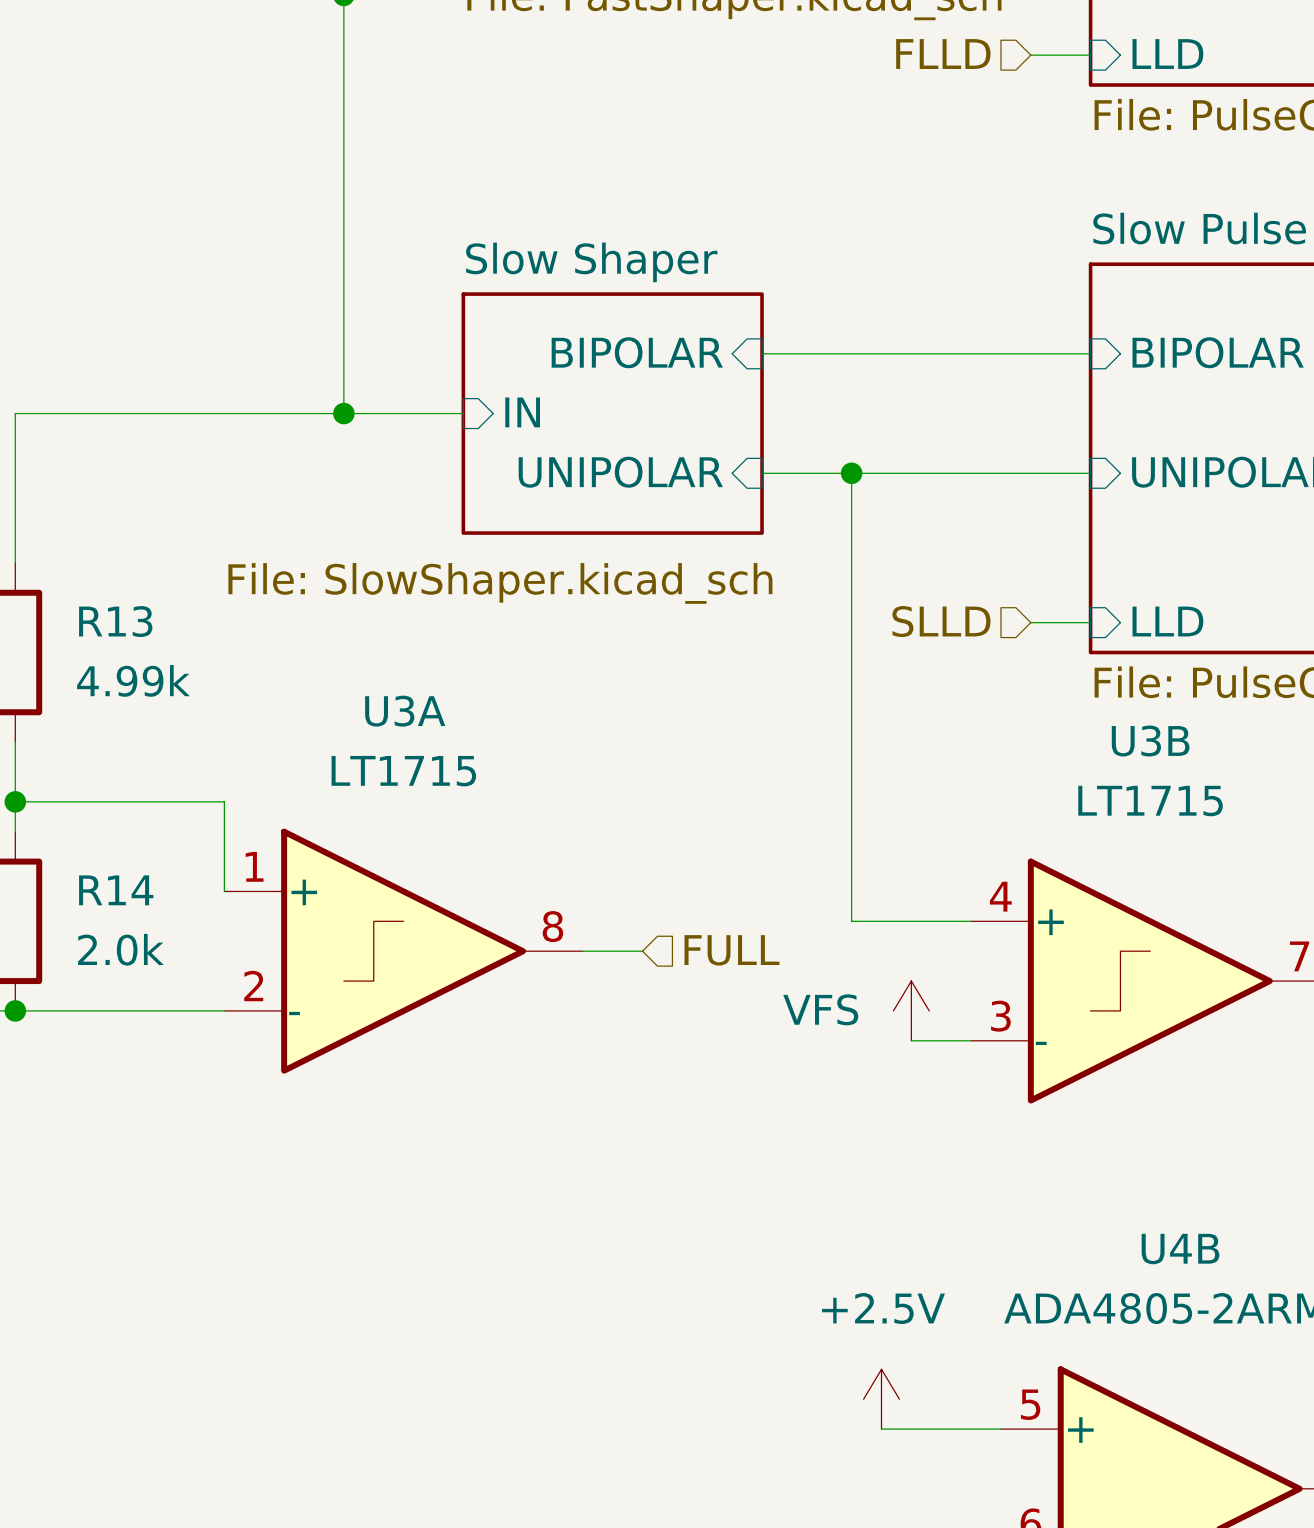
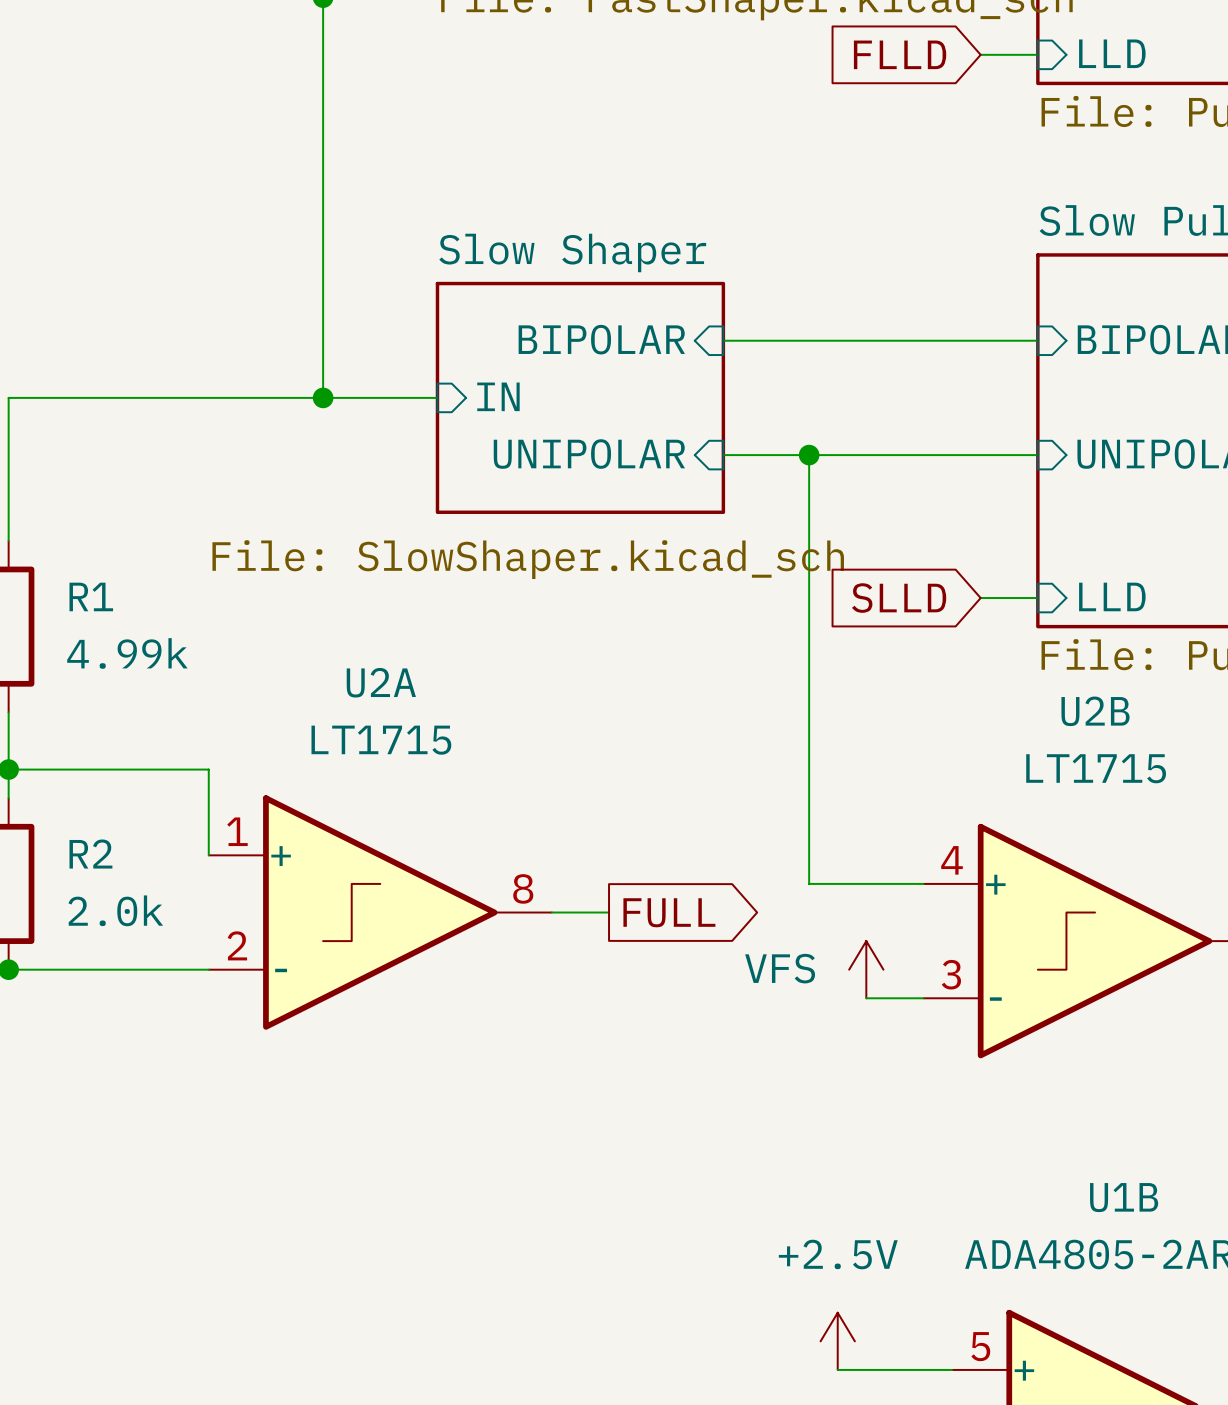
hierarchical label: FLLD (943, 54) -> none
global label: none -> FLLD (900, 54)
R13 name: R13 (115, 621) -> R1 (91, 596)
hierarchical label: SLLD (941, 621) -> none
global label: none -> SLLD (899, 598)
U3A name: U3A (405, 711) -> U2A (381, 682)
U3B name: U3B (1150, 741) -> U2B (1095, 711)
R14 name: R14 (116, 890) -> R2 (90, 854)
hierarchical label: FULL (731, 950) -> none
global label: none -> FULL (669, 912)
U4B name: U4B (1180, 1249) -> U1B (1124, 1197)

